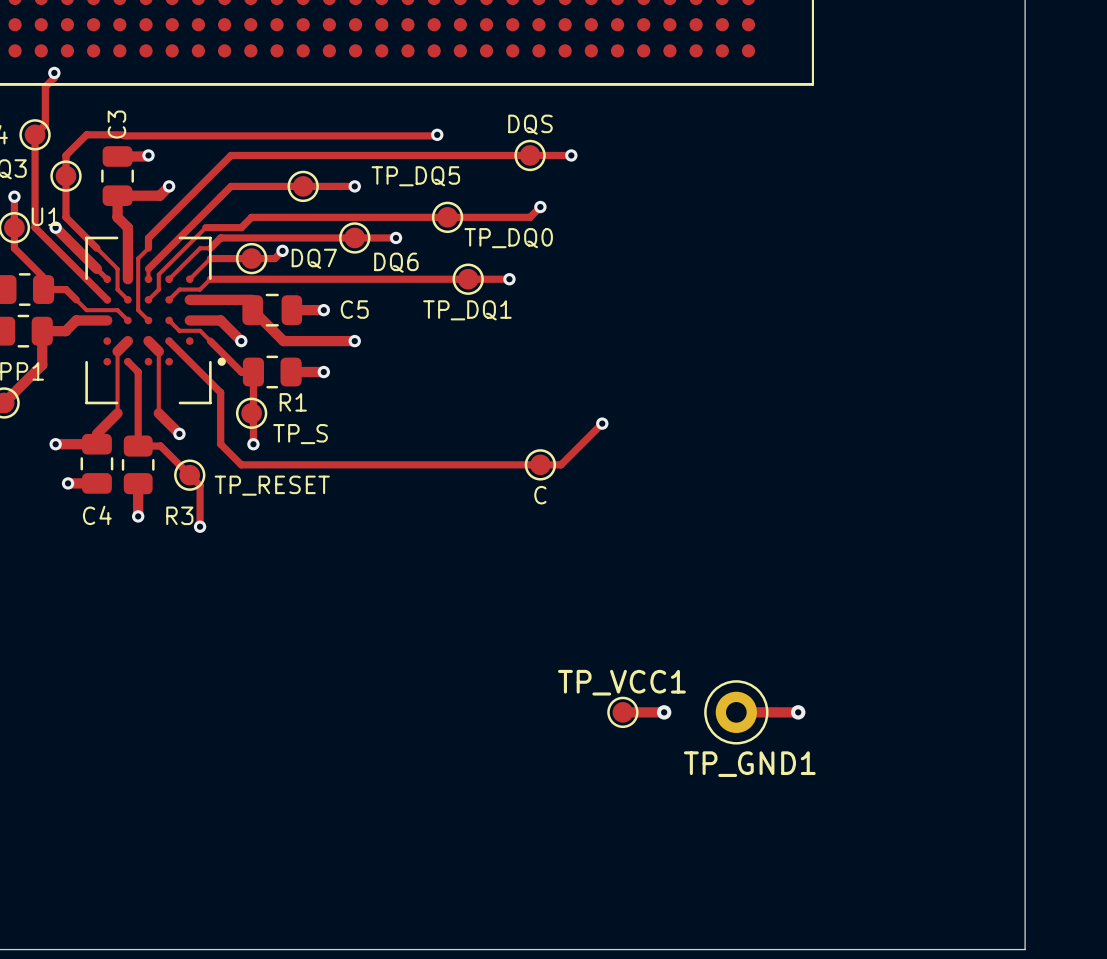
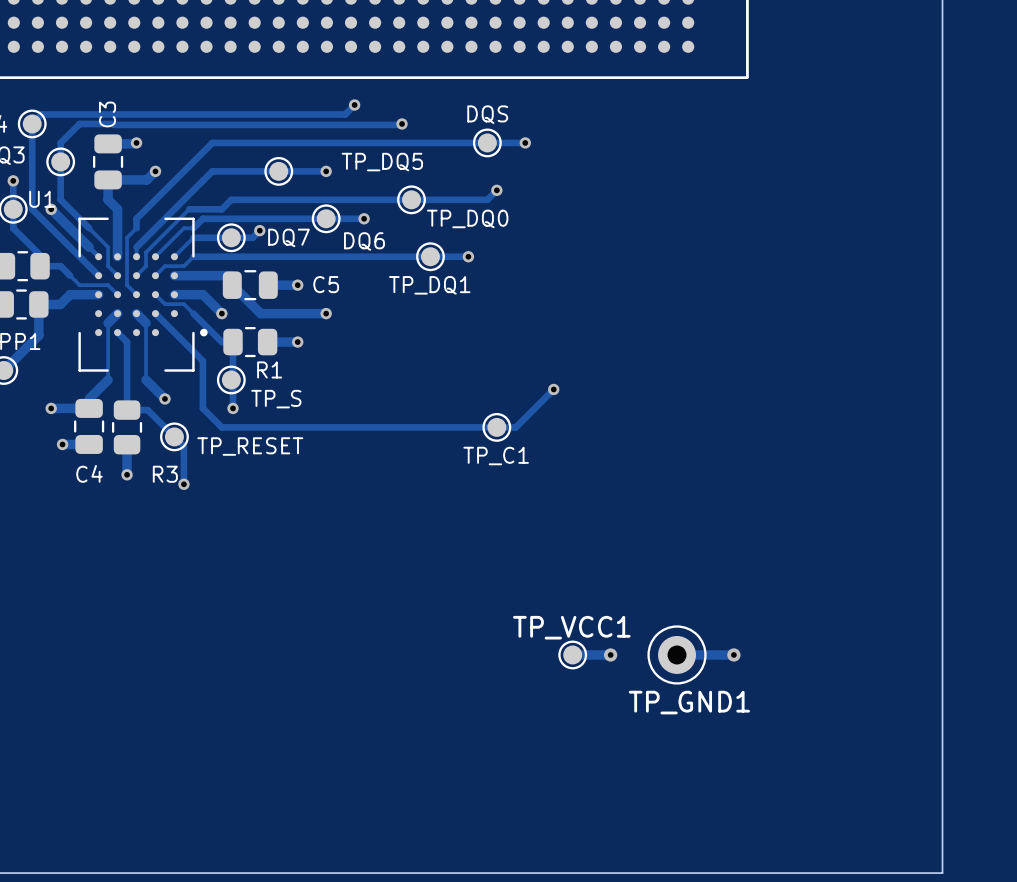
track: (54, 72) (54, 77) (45, 86) (45, 124) -> (354, 105) (345, 114) (41, 114)
via: (54, 72) -> none
via: none -> (354, 105)
C name: C (540, 495) -> TP_C1 (496, 456)

